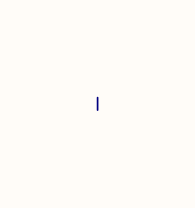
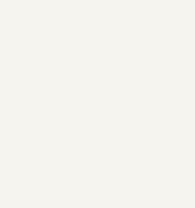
line: (97, 97) (97, 110) -> none

